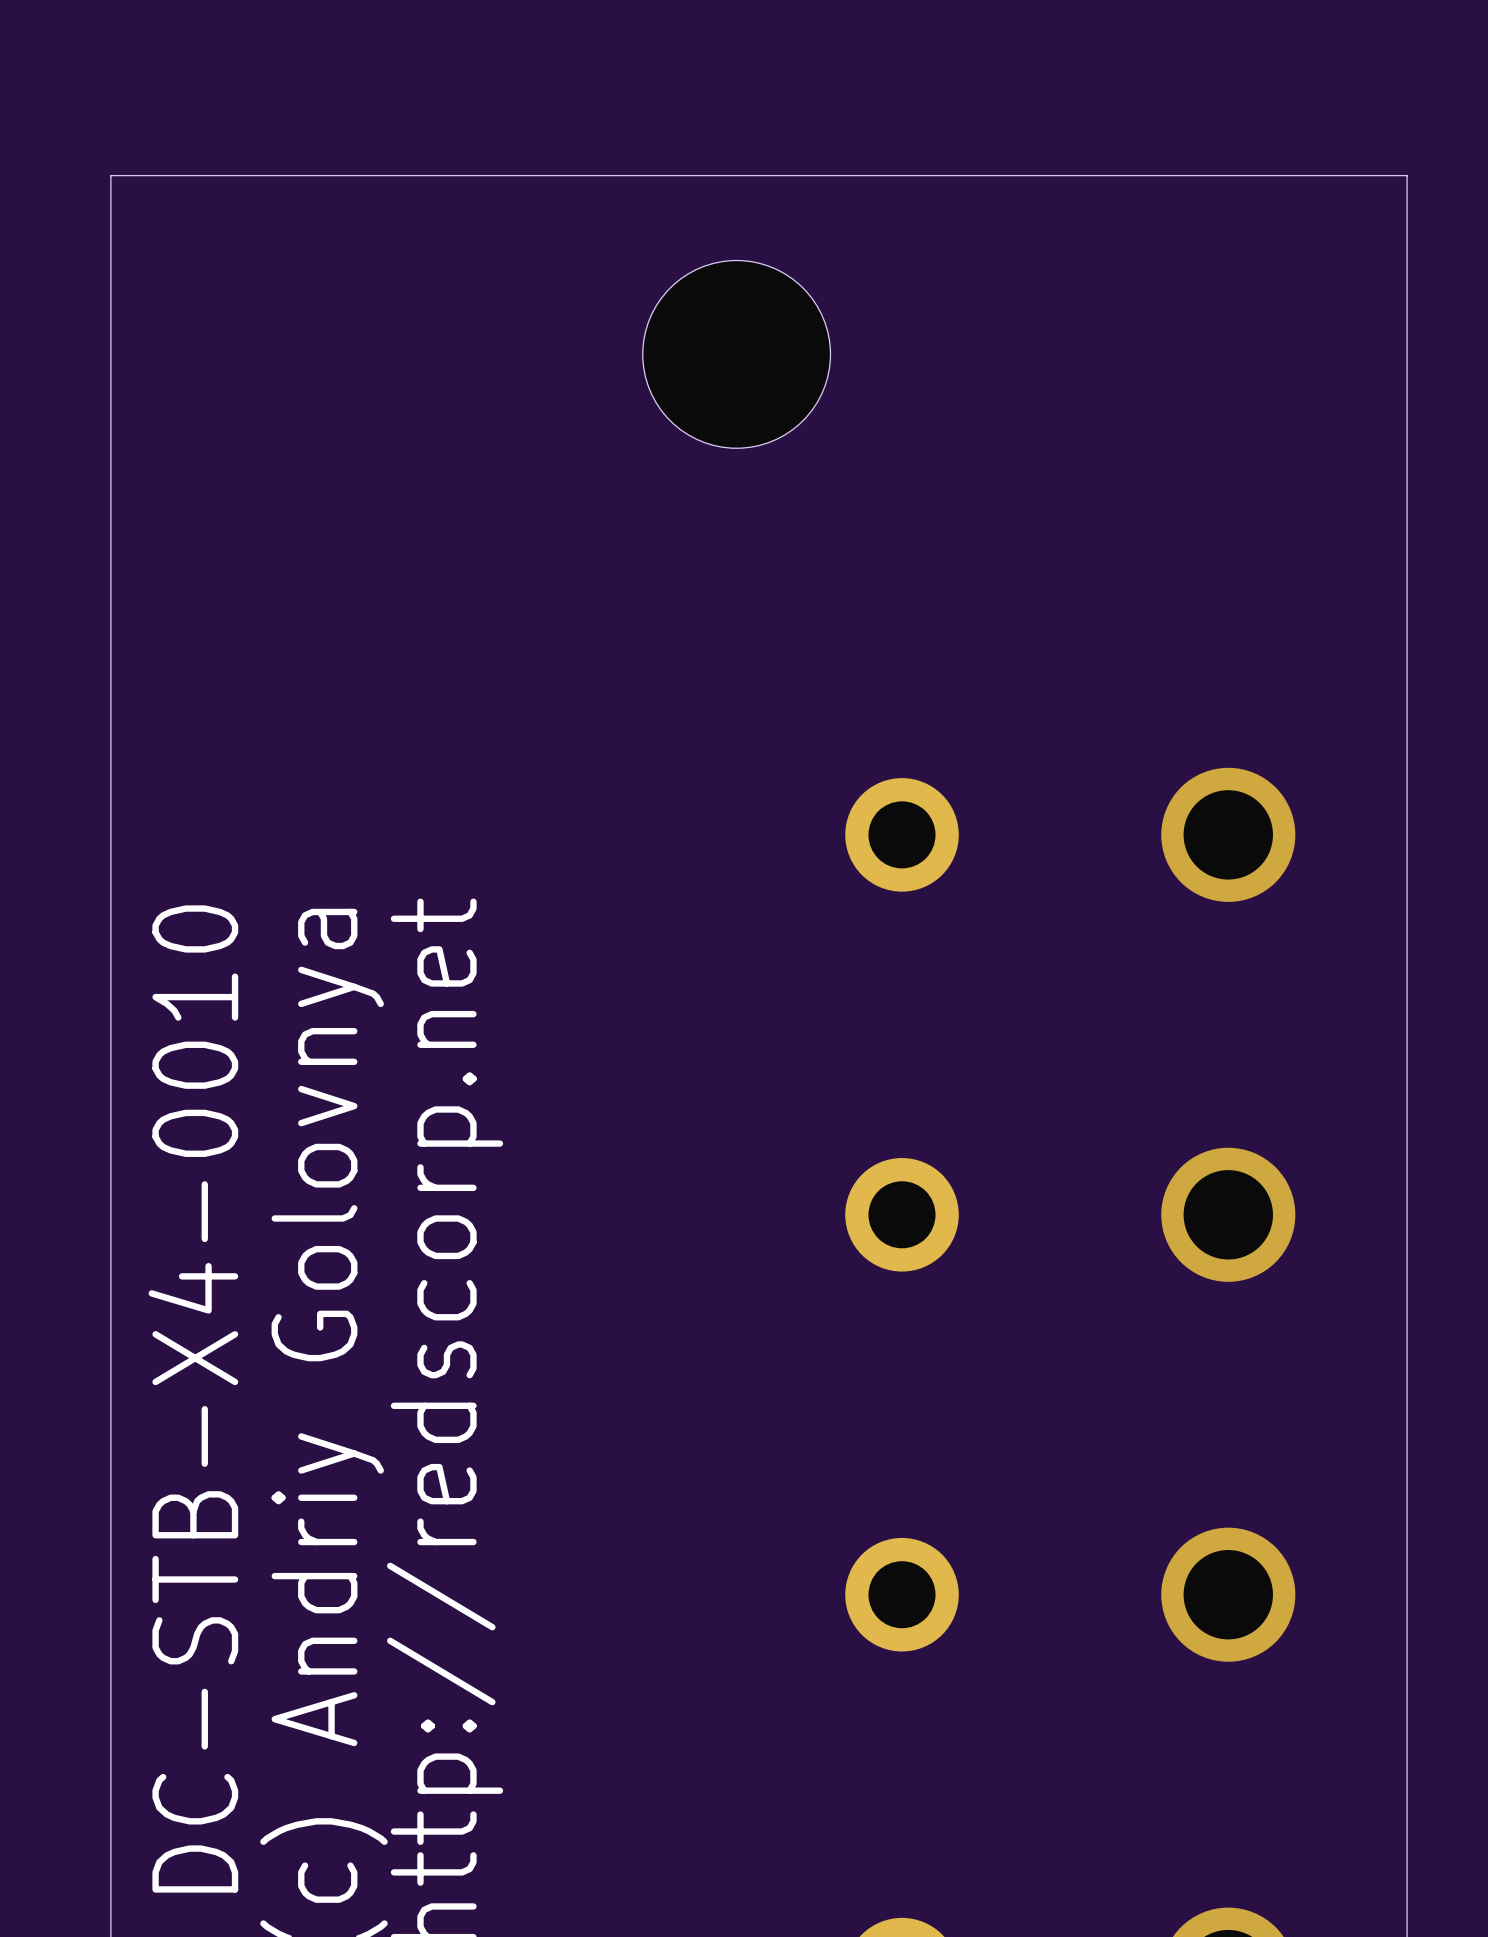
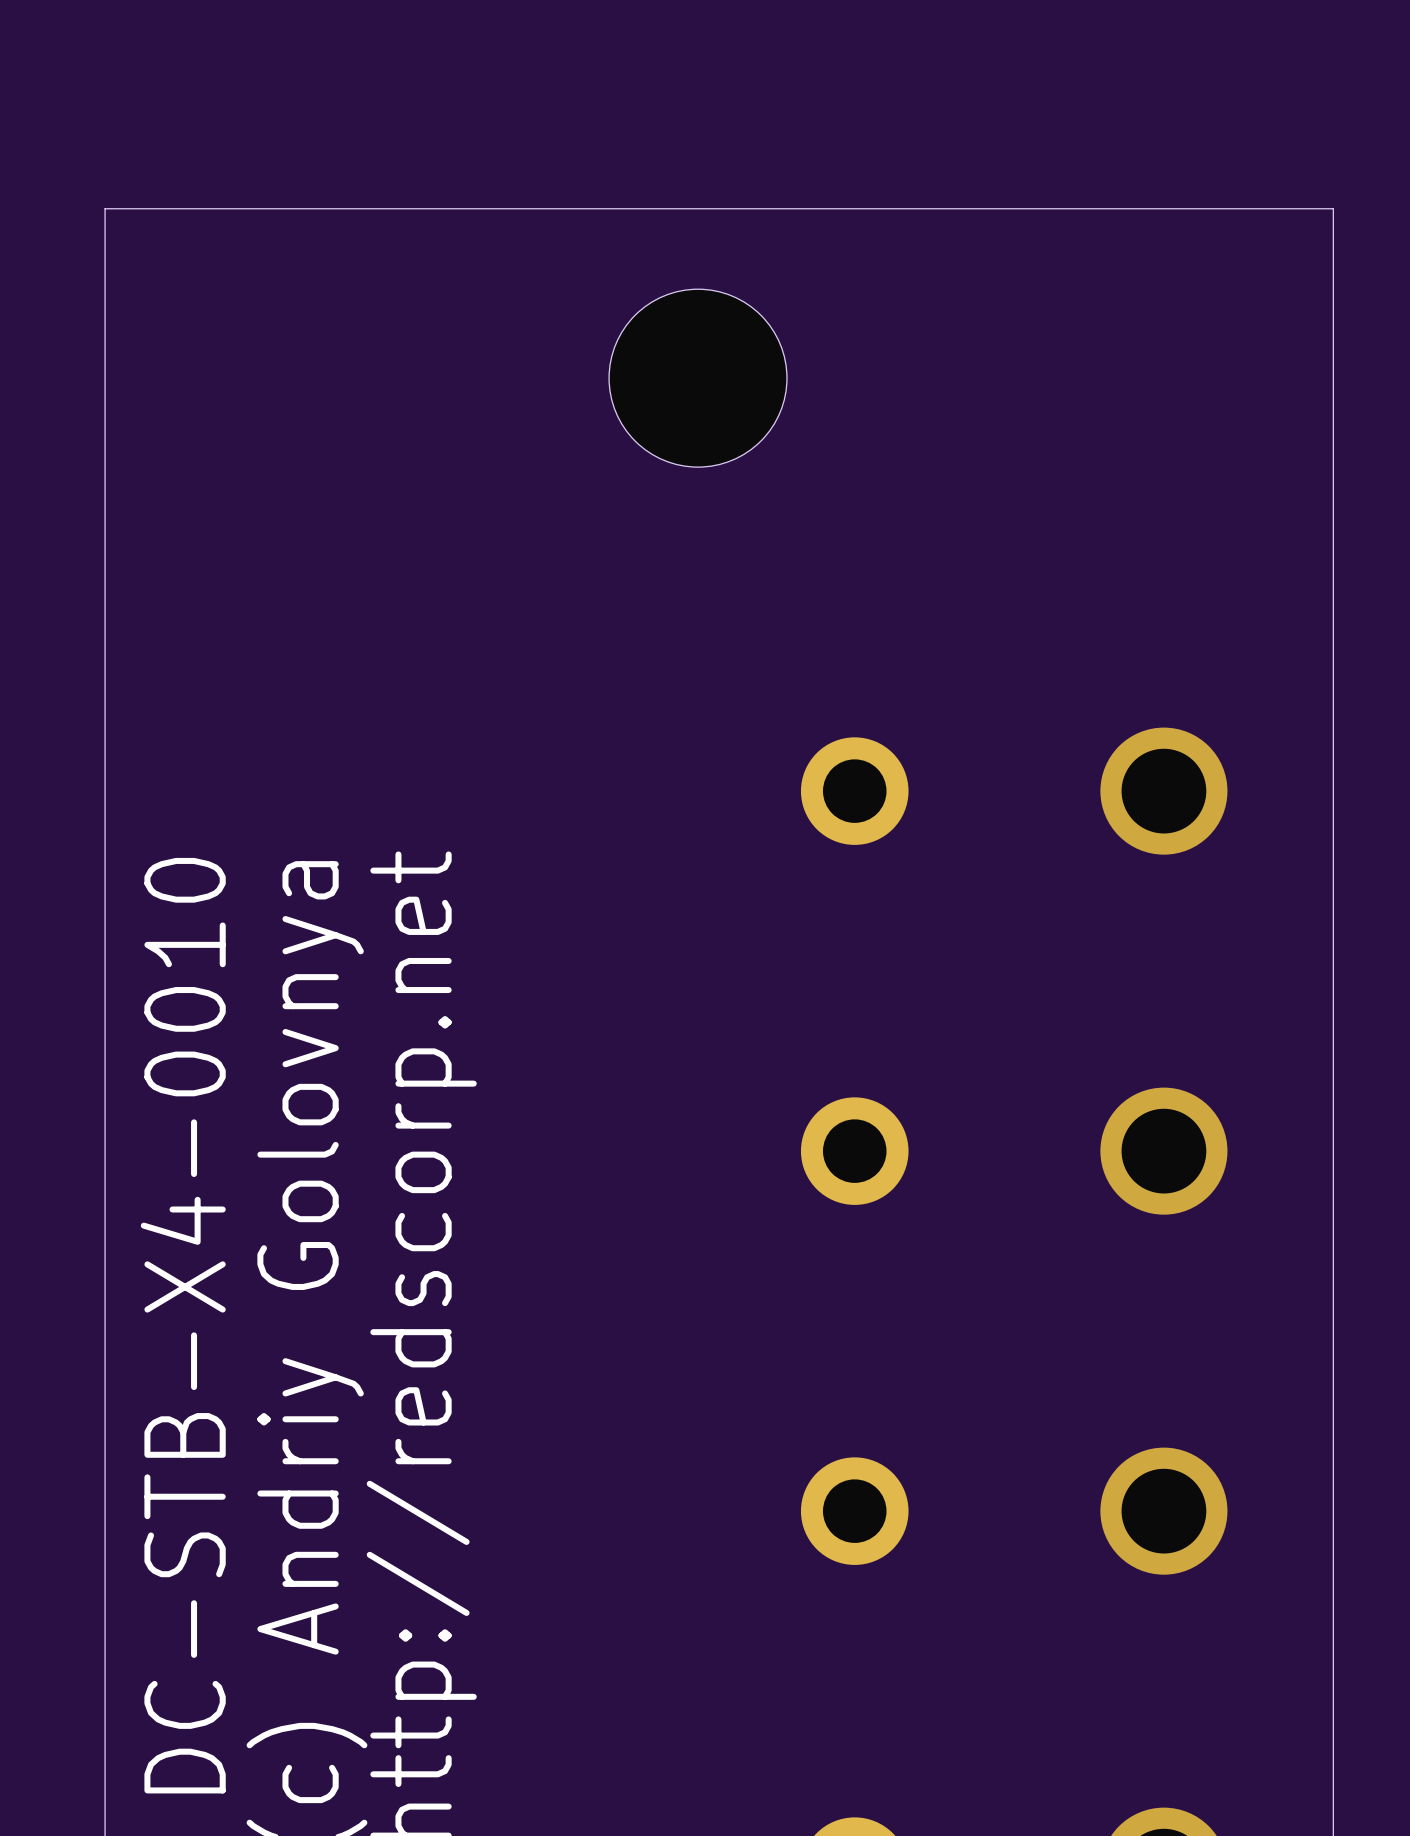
board edge: (1407, 220) (1407, 175) (110, 175) (110, 220) -> (1333, 208) (105, 208)
hole position: (736, 354) -> (698, 378)

